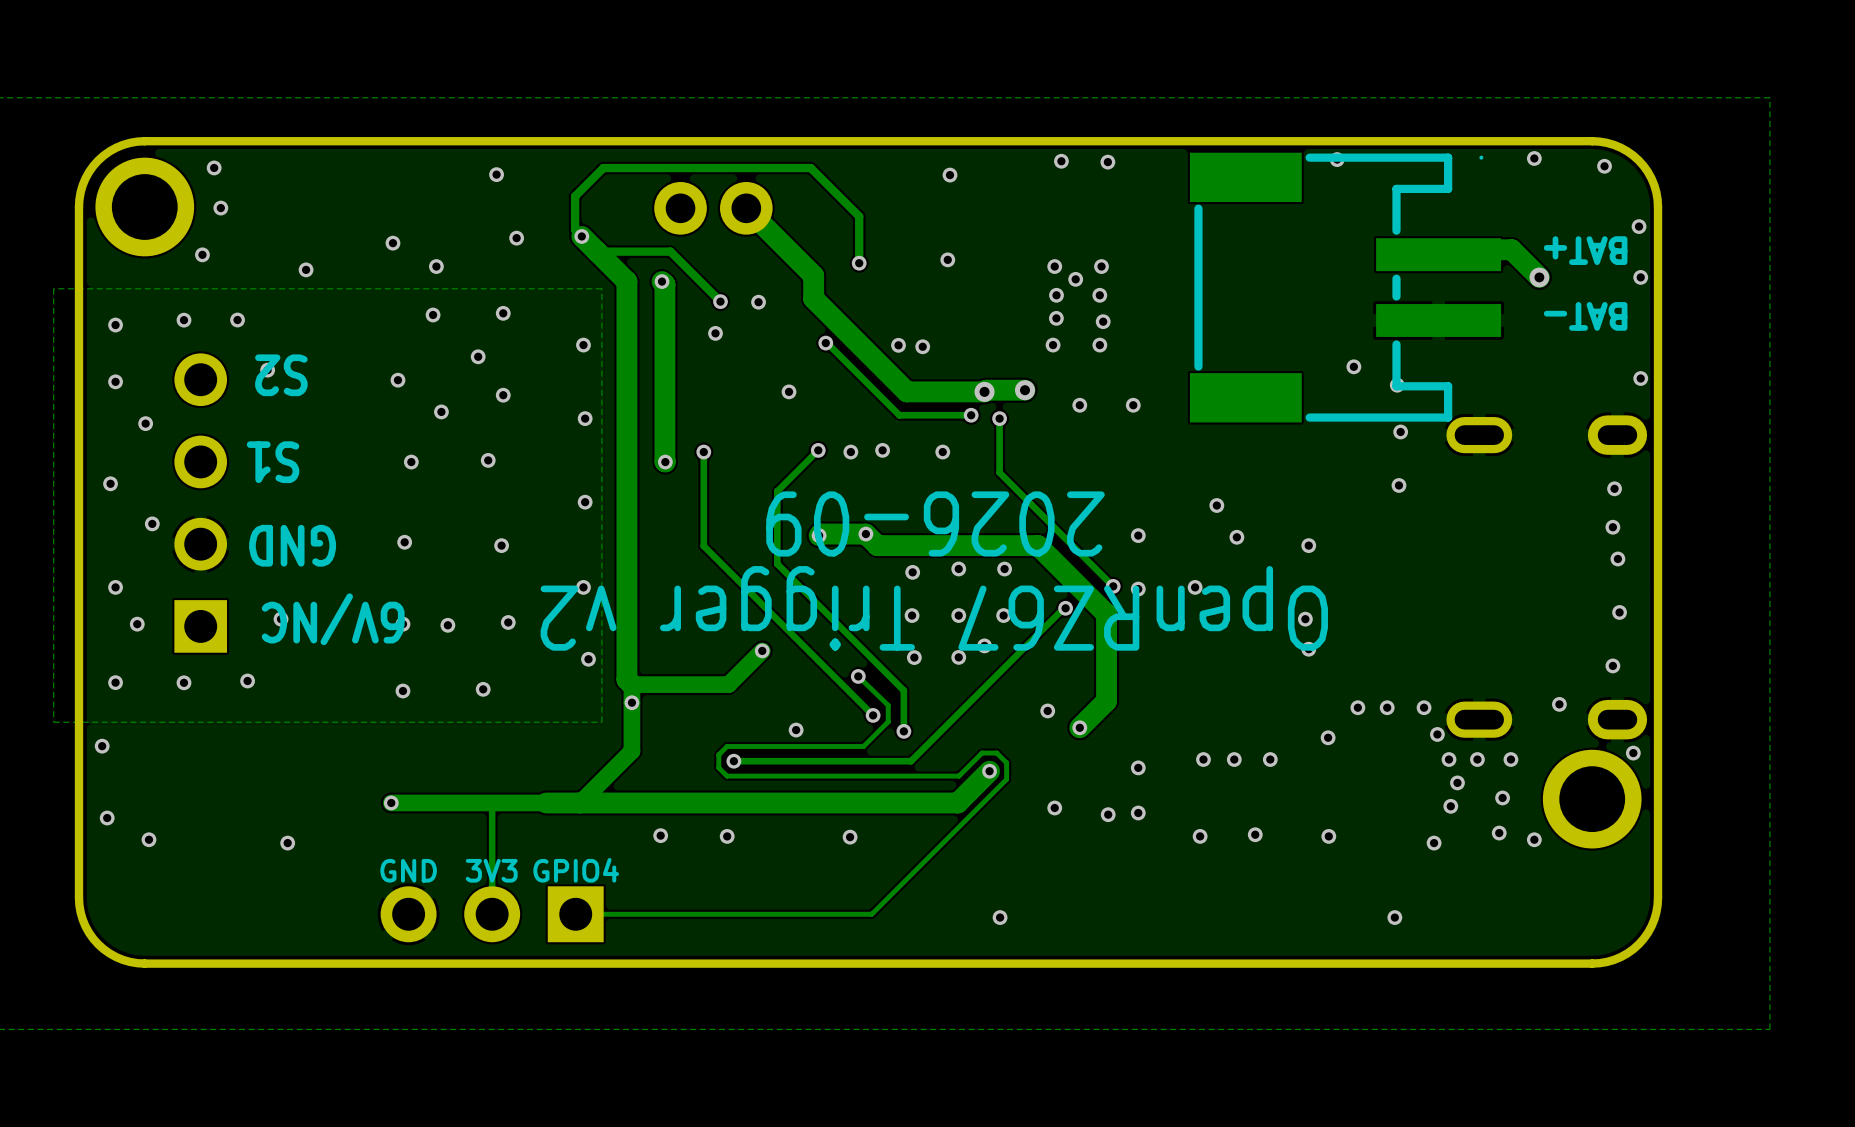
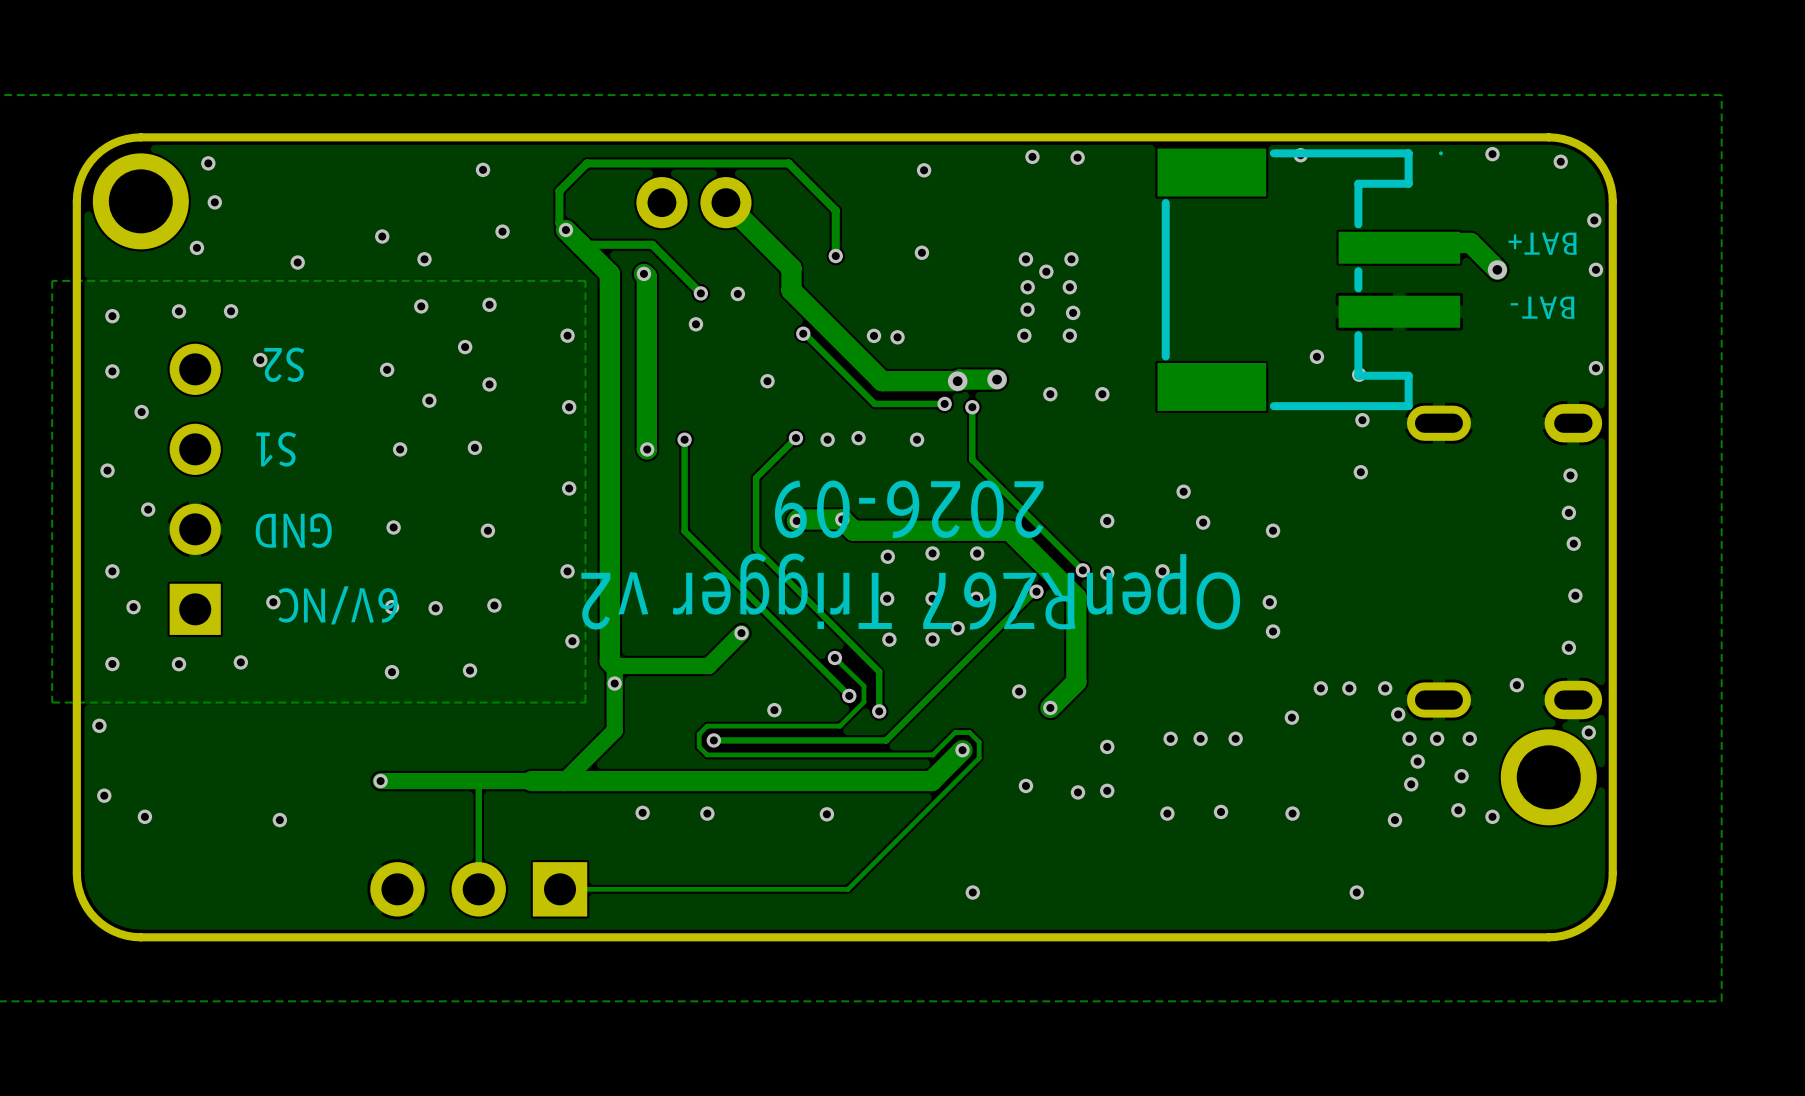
text: GND (408, 870) -> none
text: 3V3 (491, 870) -> none
text: GPIO4 (576, 870) -> none

